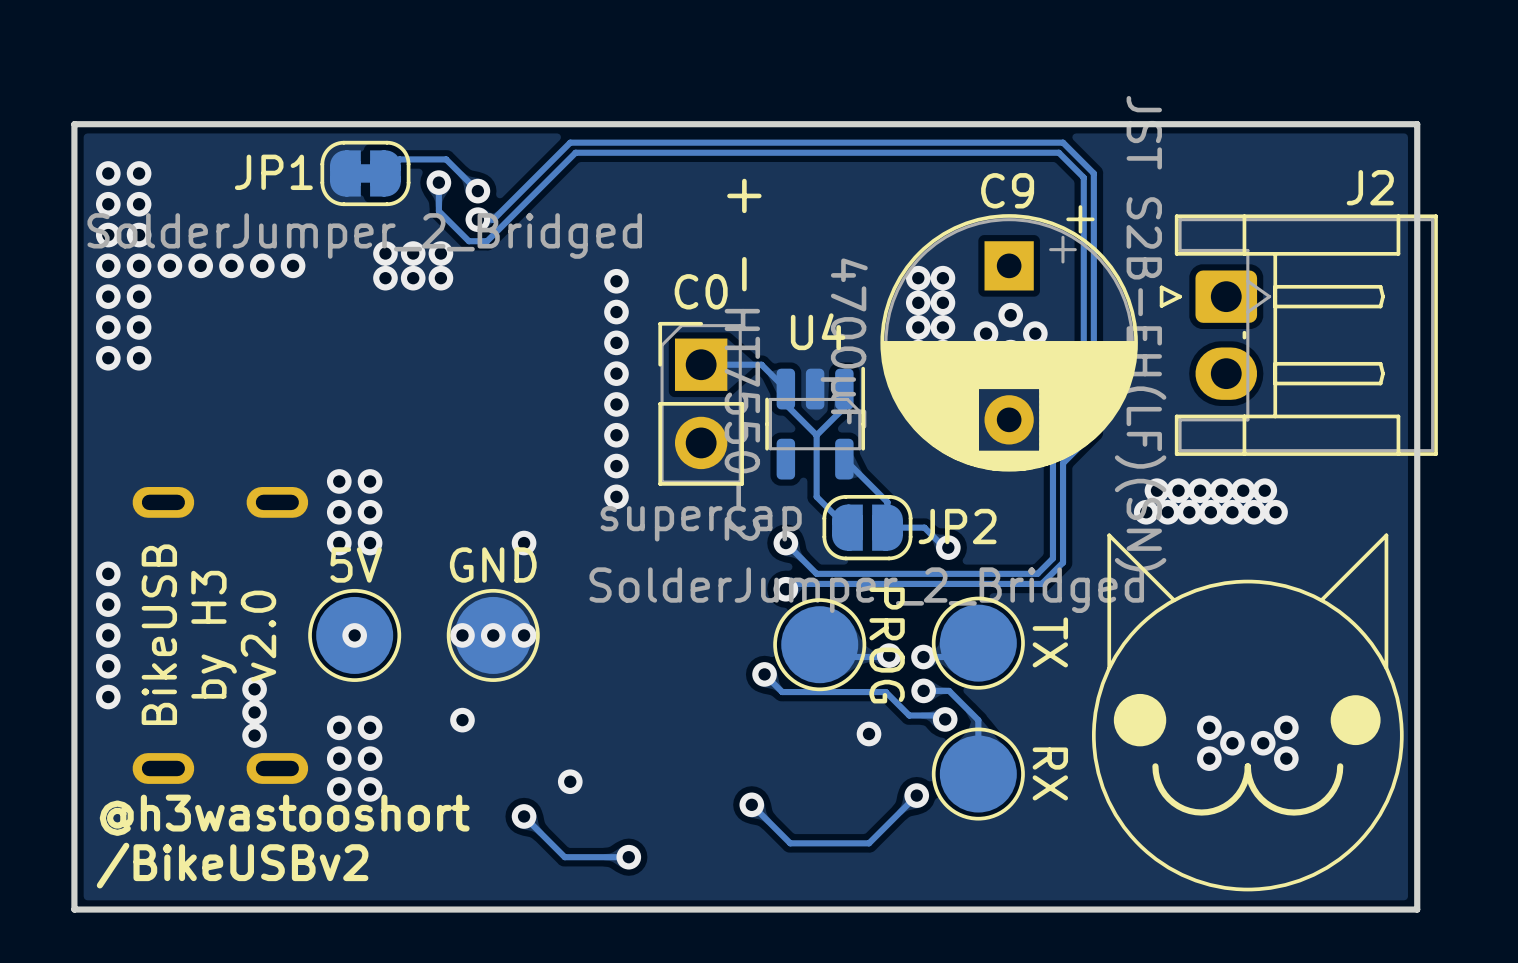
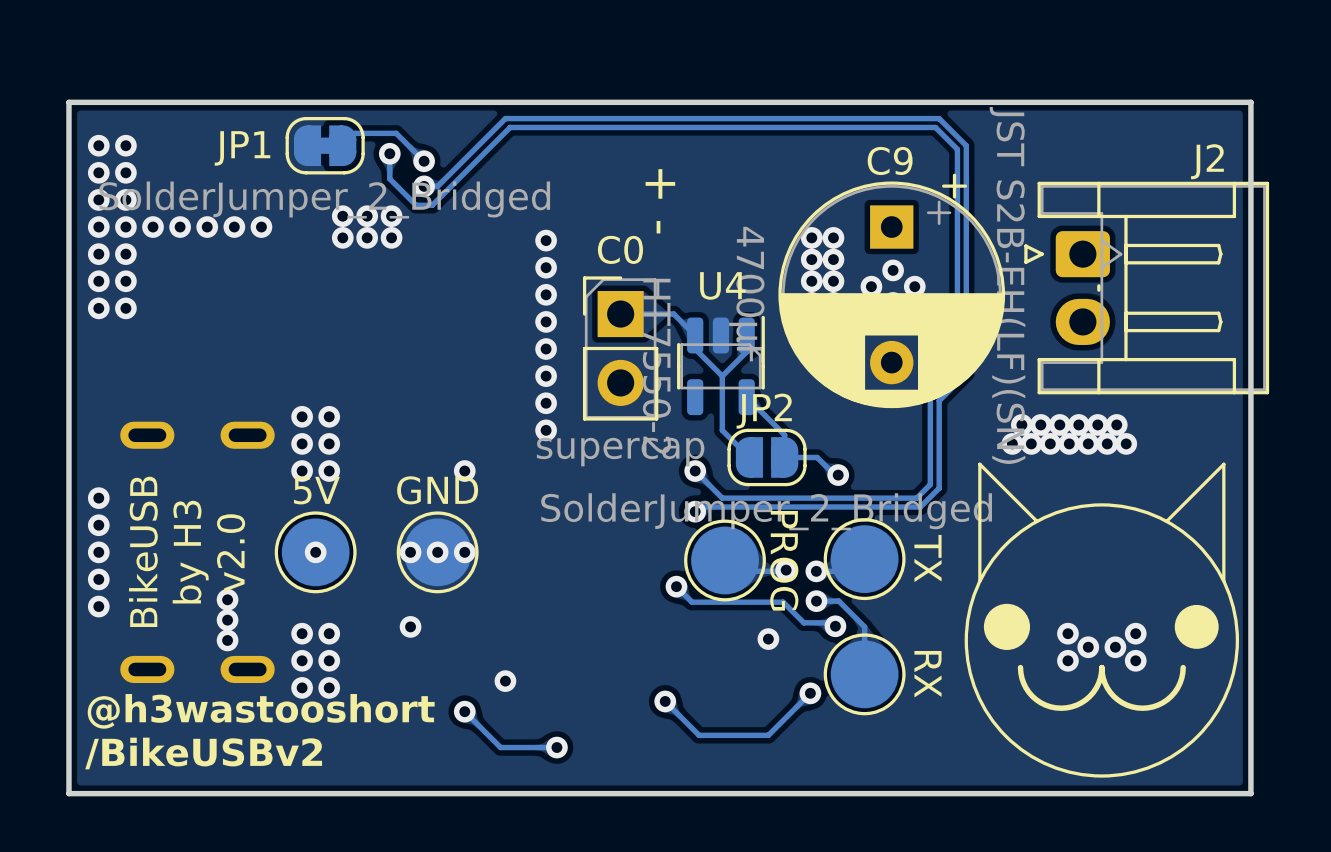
JP2 name position: JP2 (957, 526) -> JP2 (764, 411)

